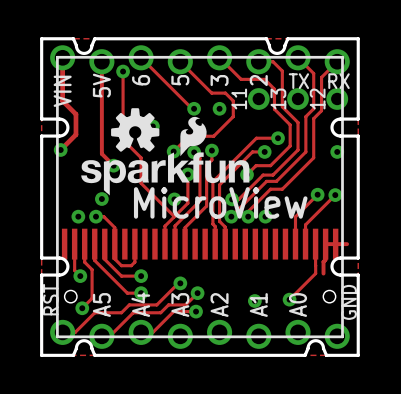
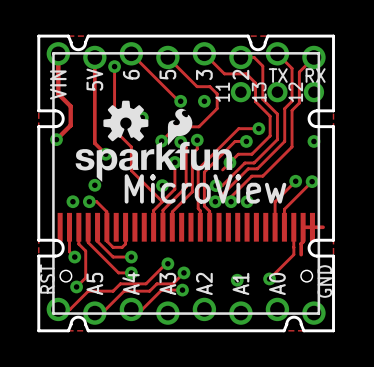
track: none -> (229, 162) (222, 169)

